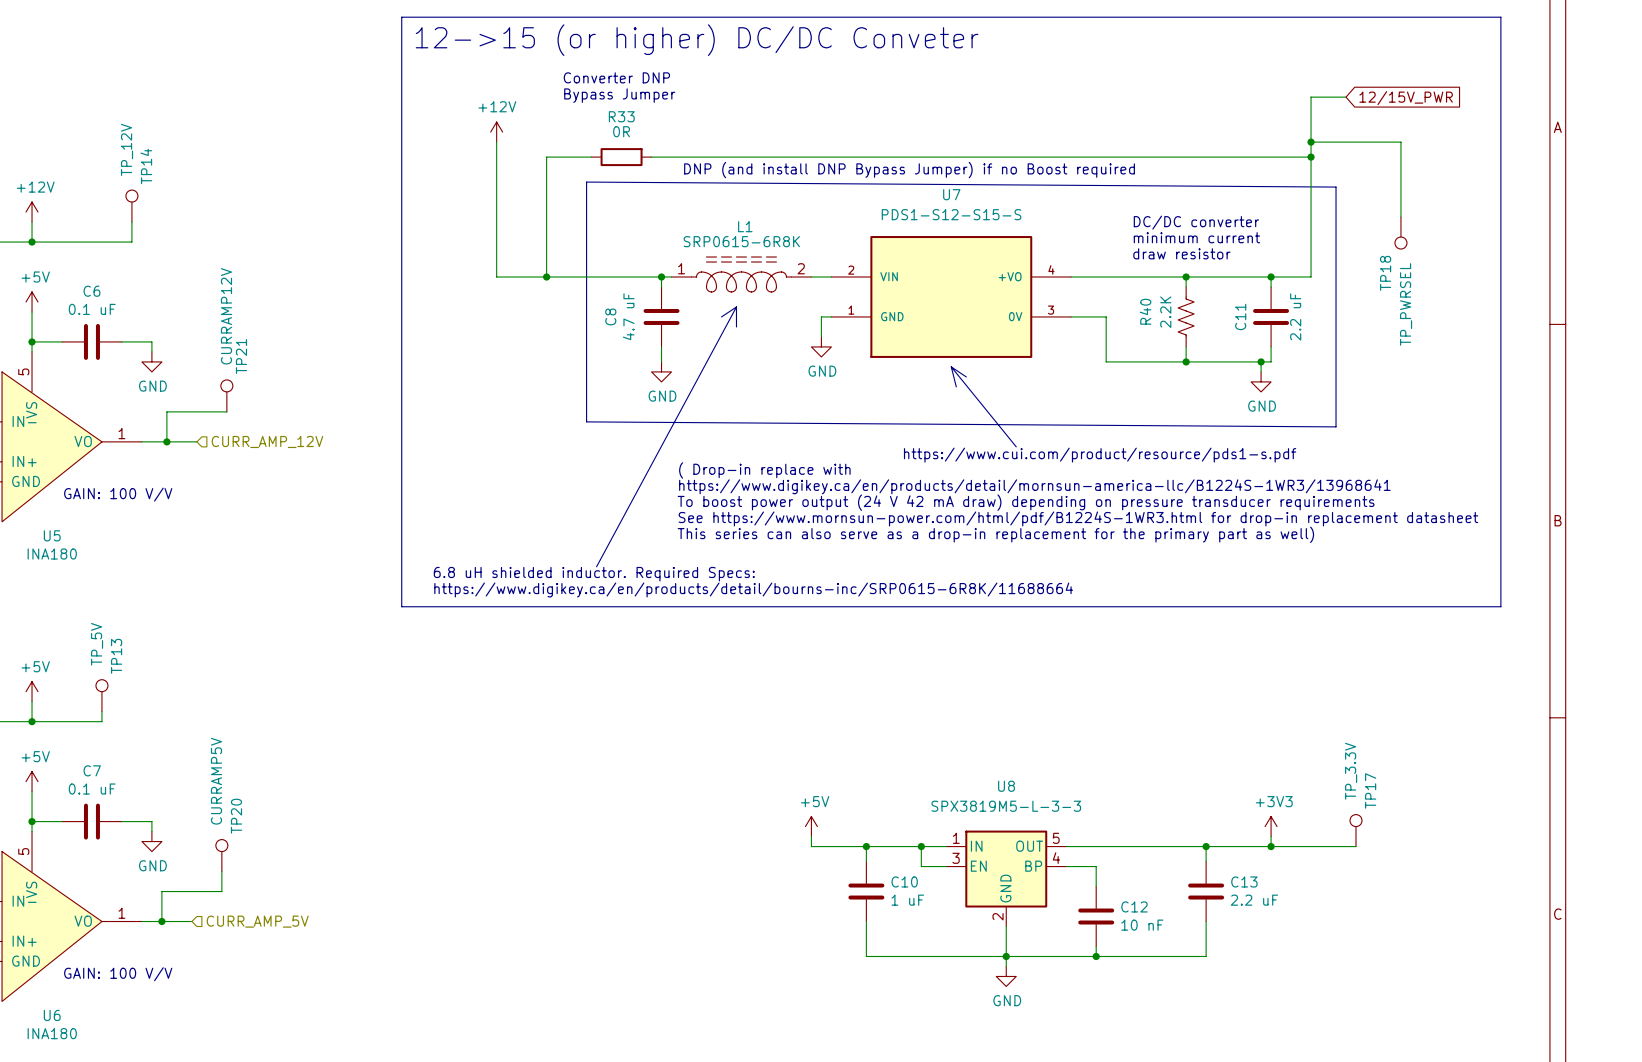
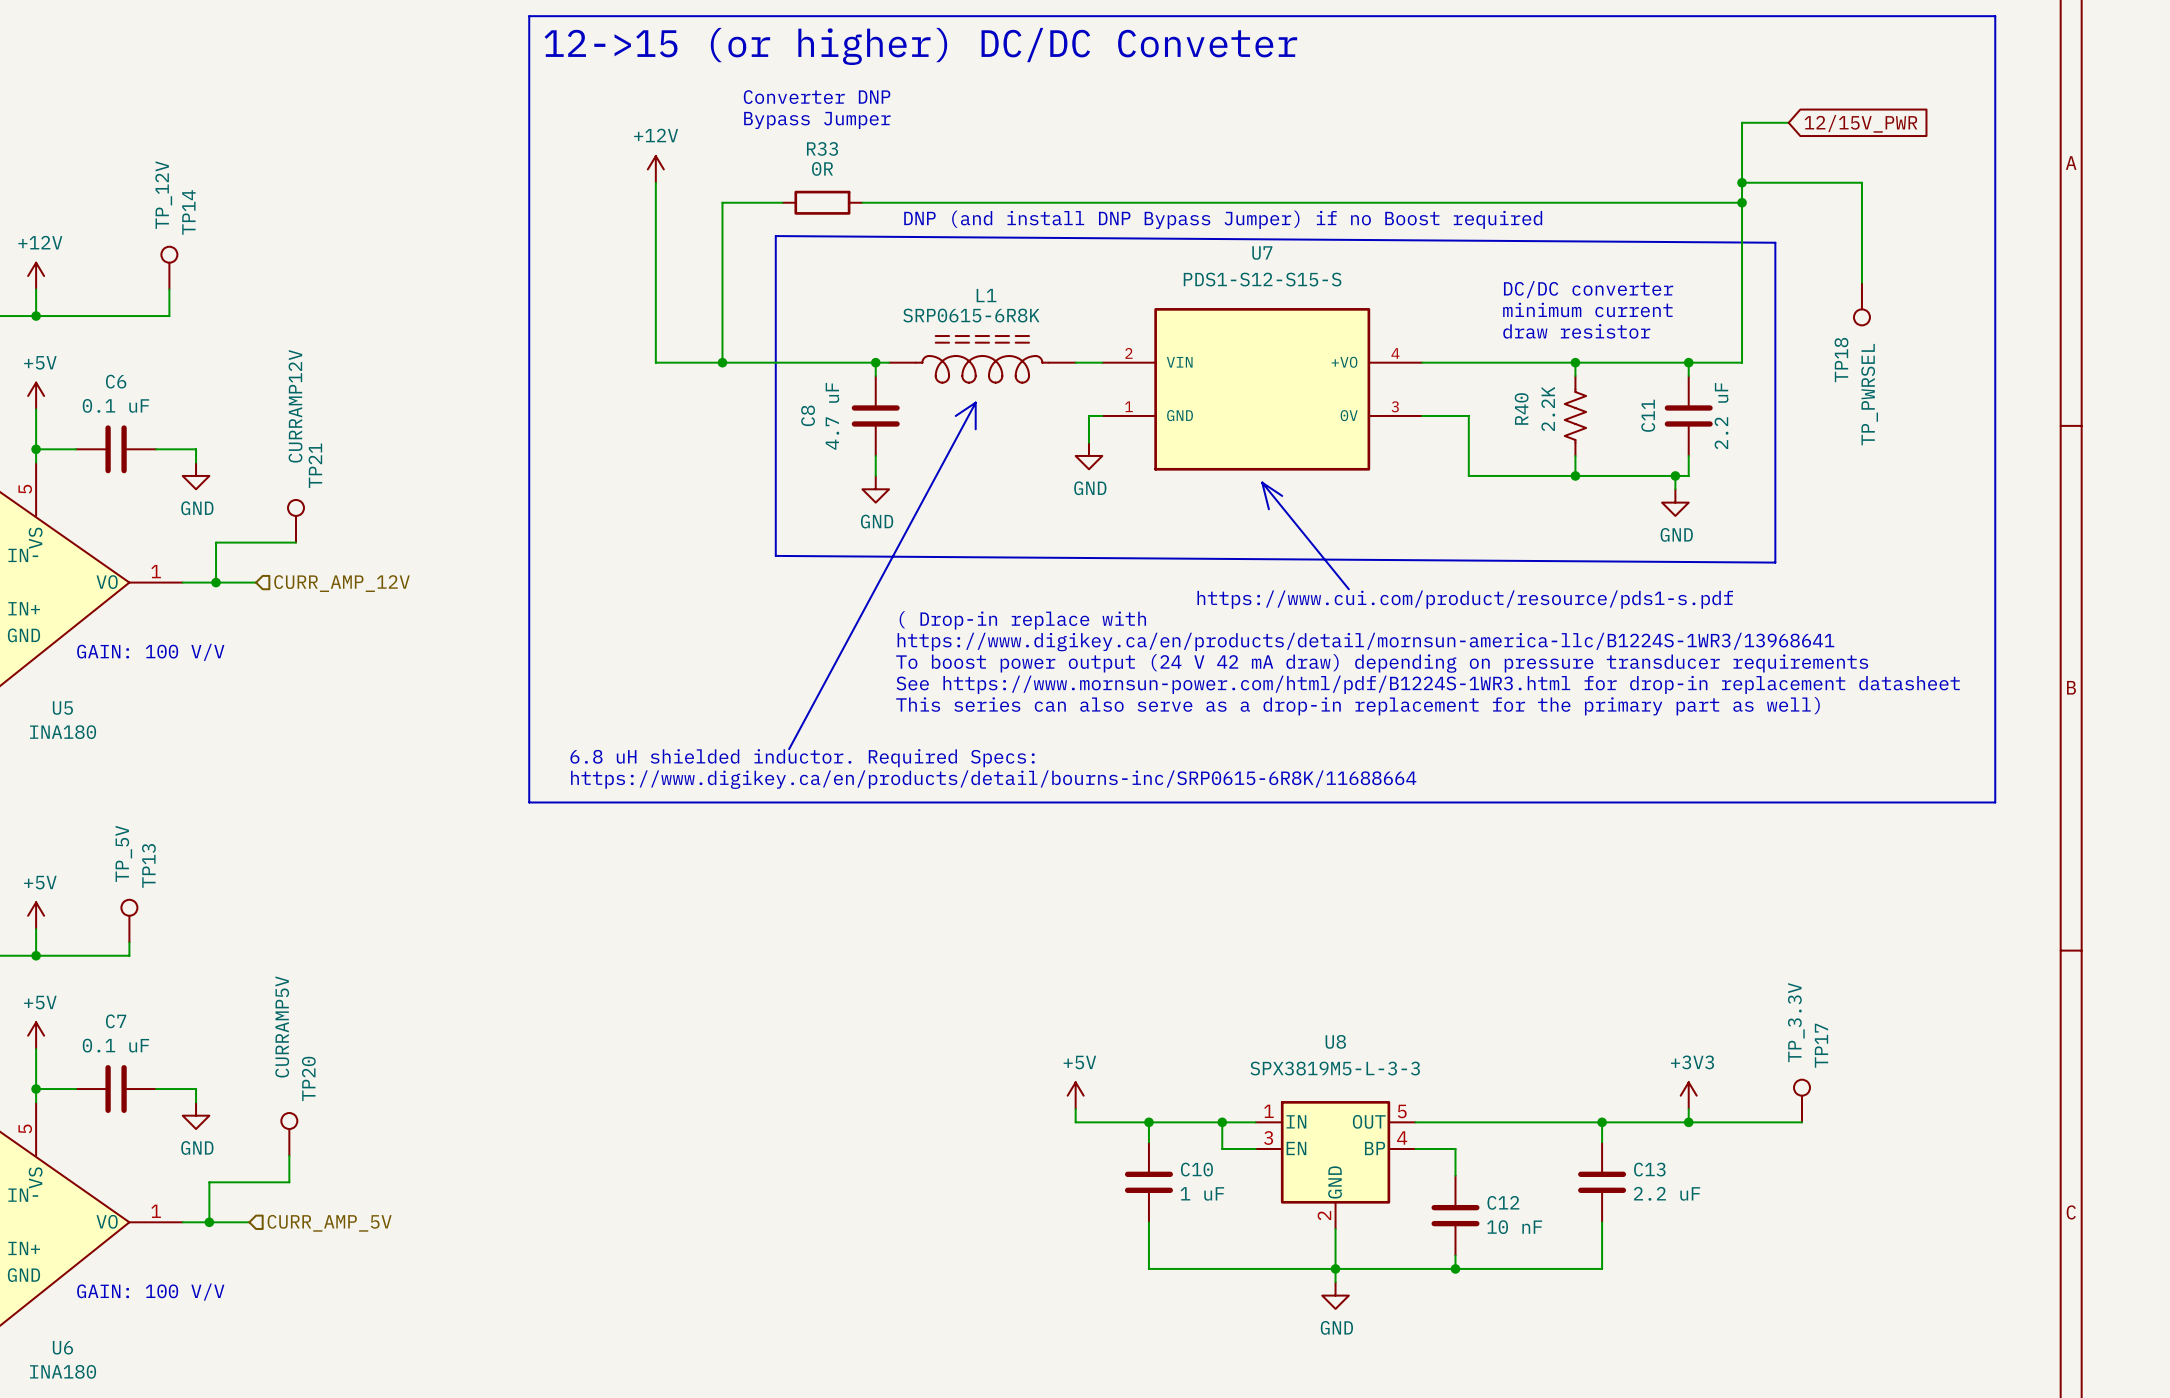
L1 pin number: 1 (681, 268) -> none
L1 pin number: 2 (801, 268) -> none

